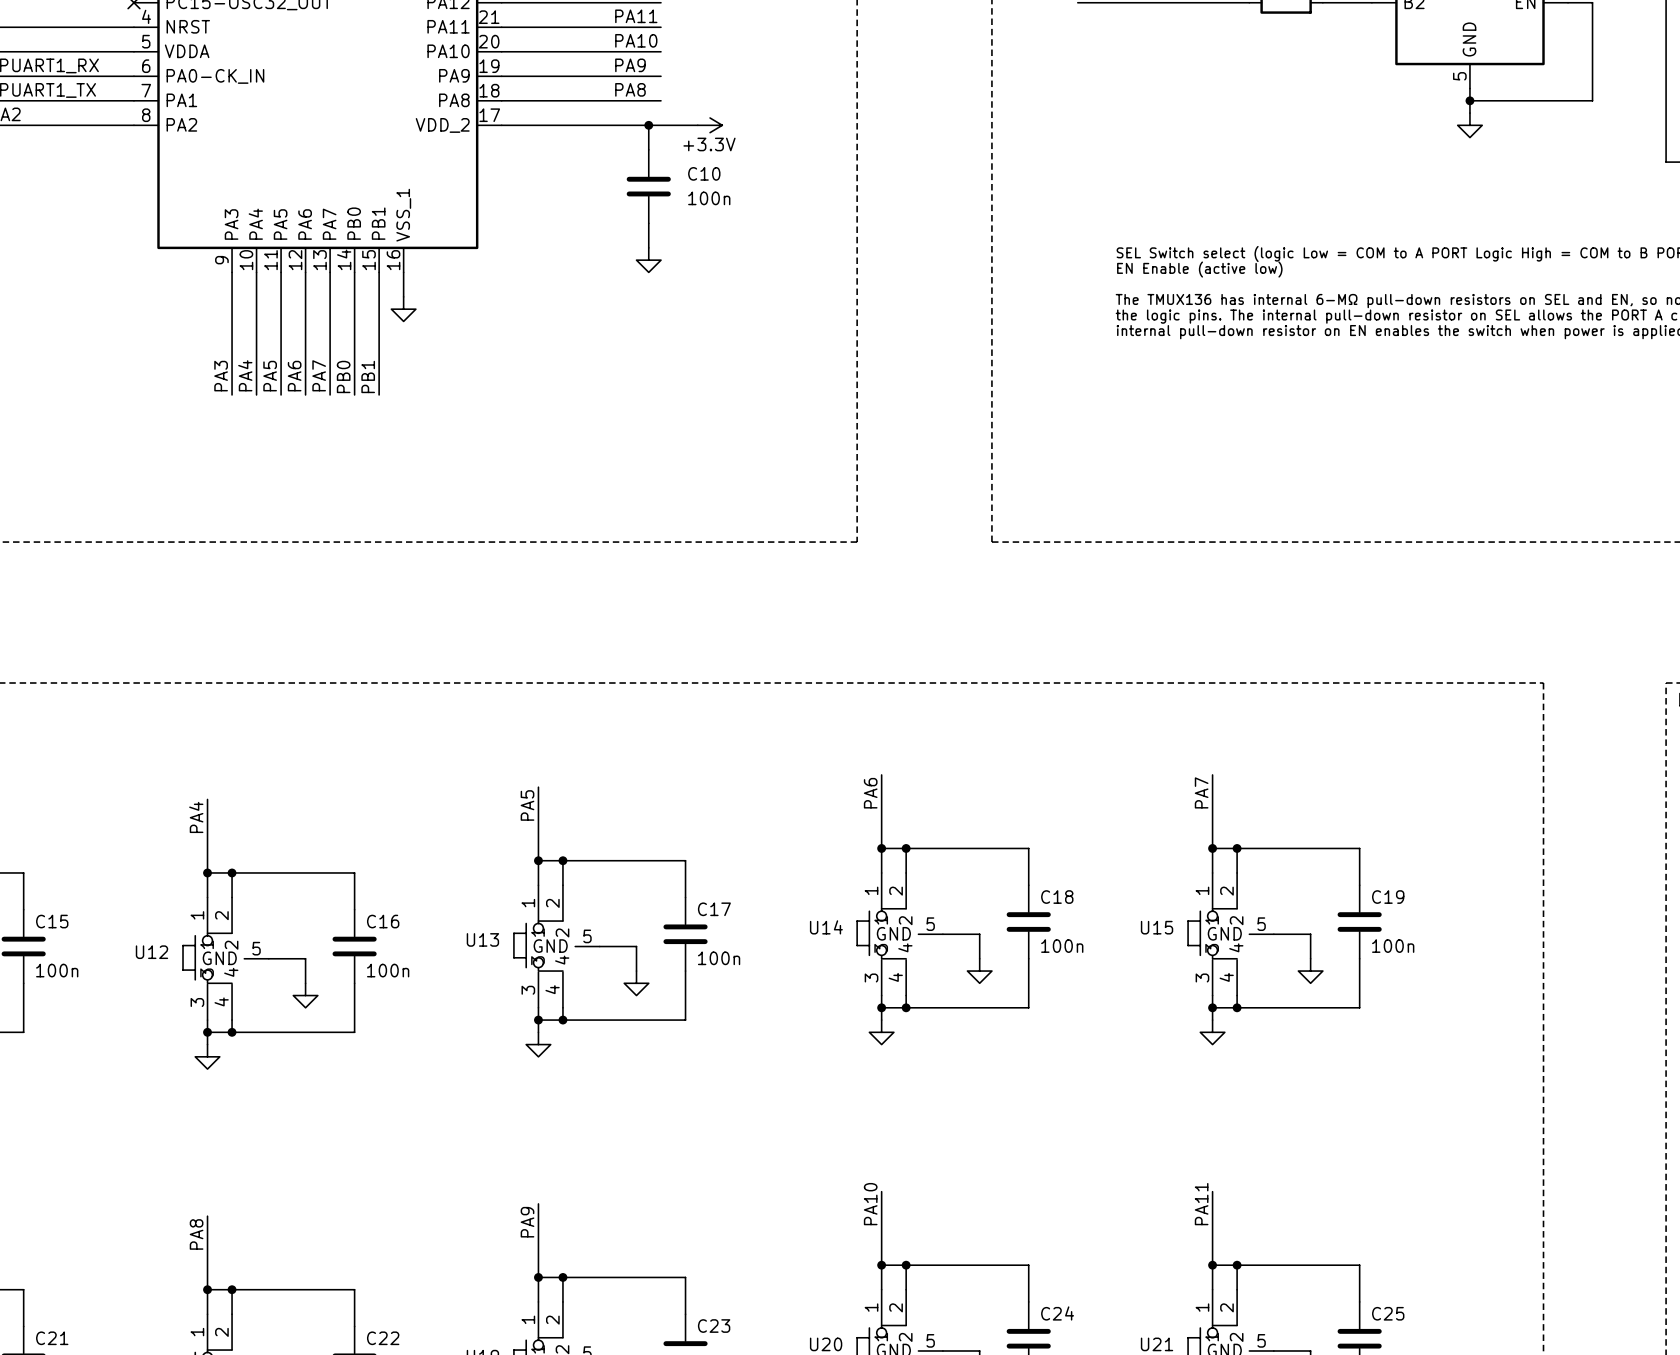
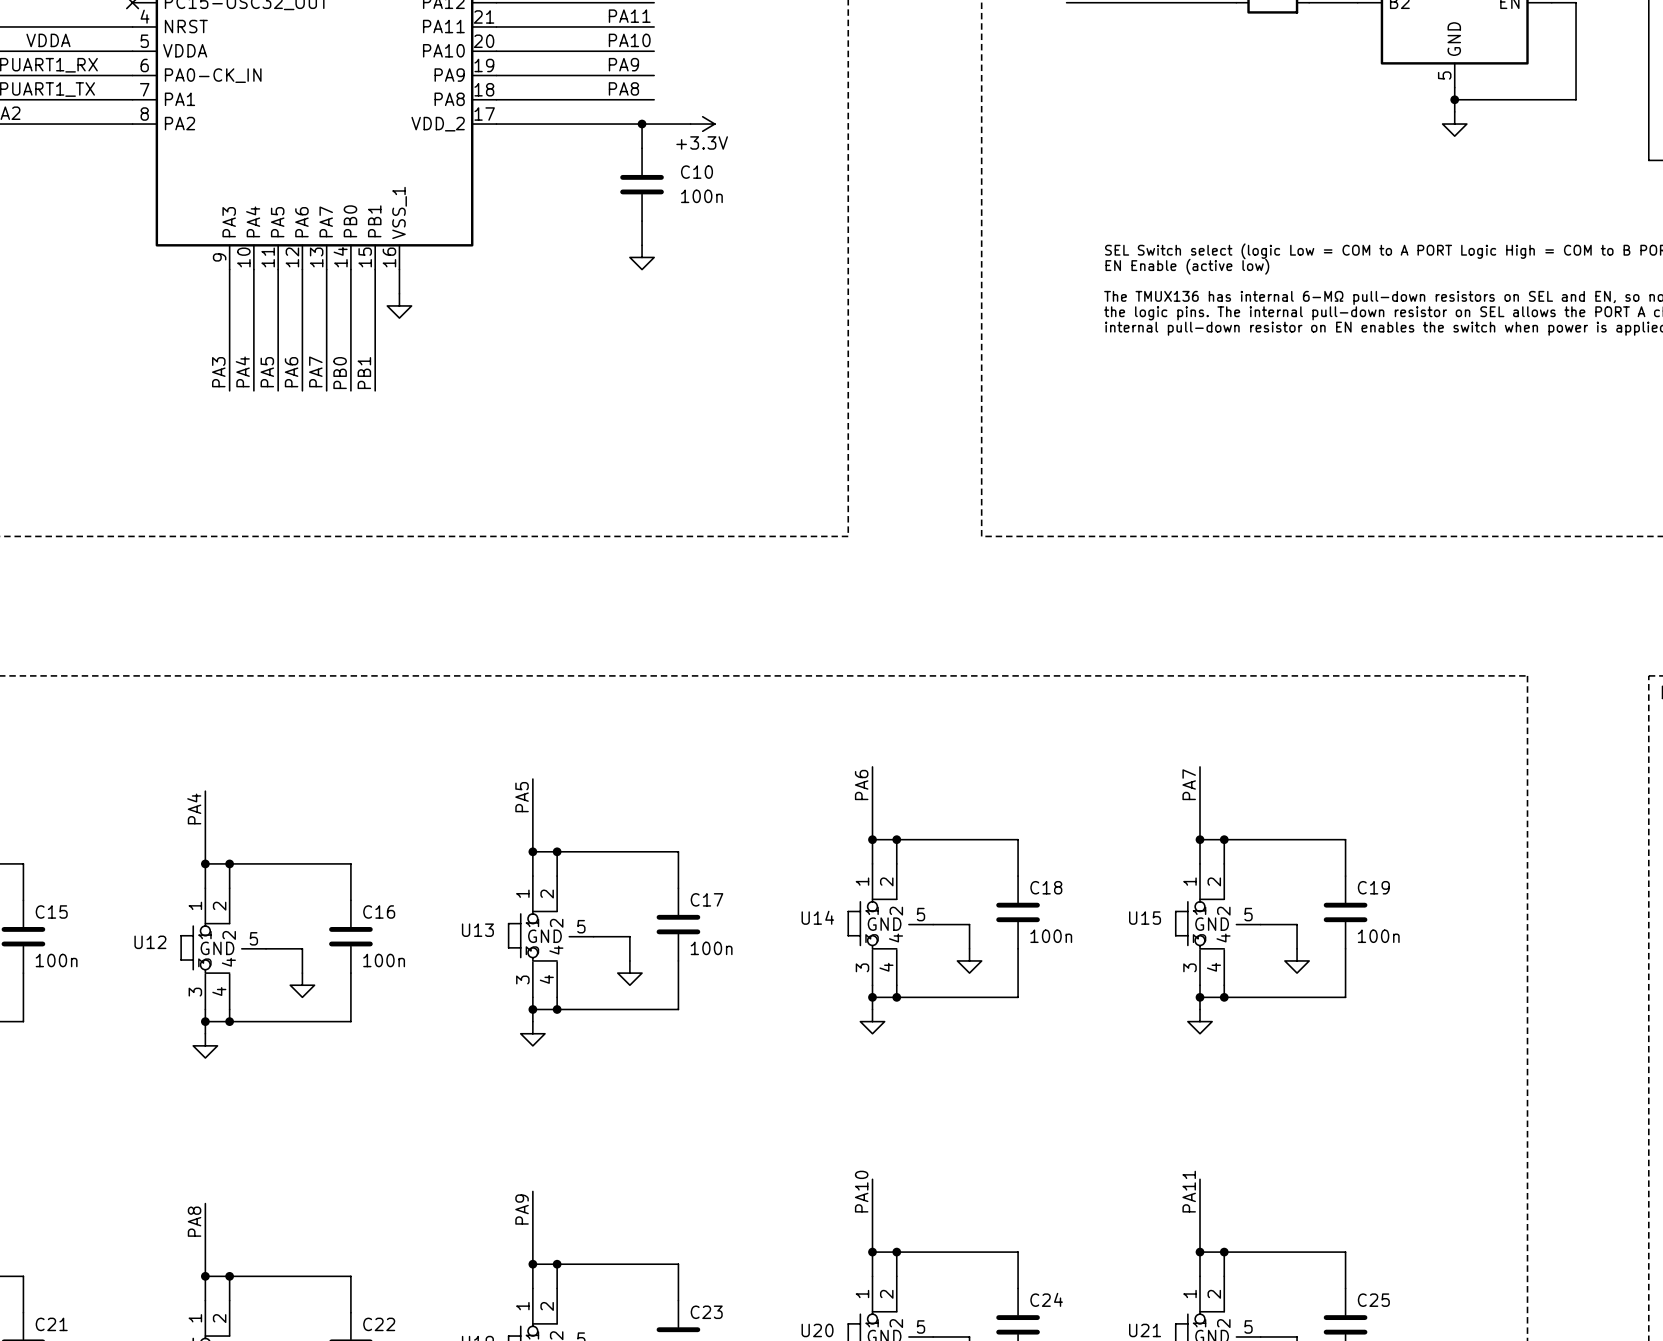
label: none -> VDDA (48, 40)

